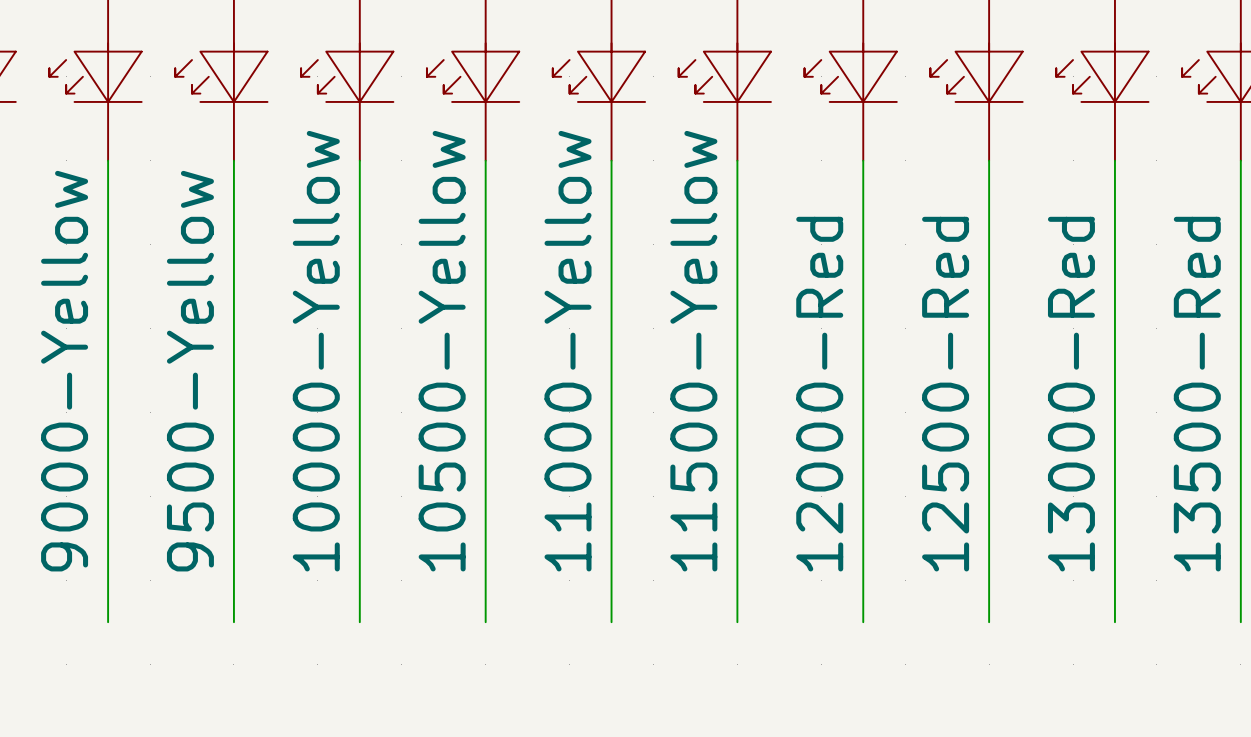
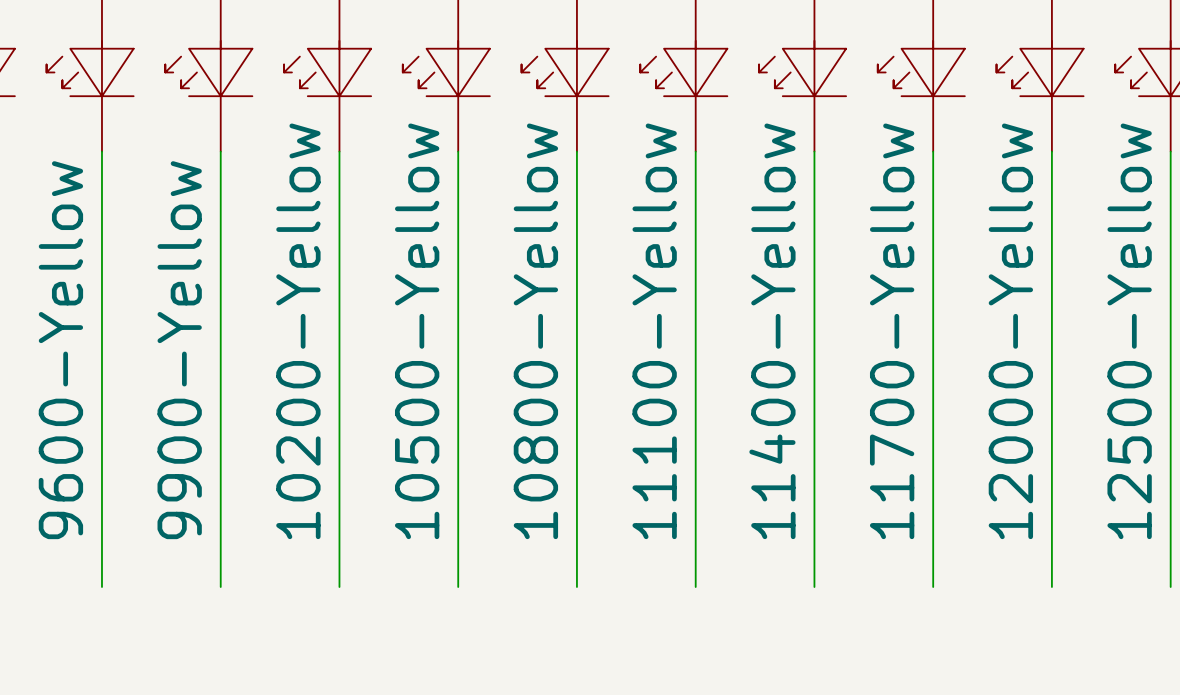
part value: 10000-Yellow (316, 351) -> 10200-Yellow (298, 331)
part value: 11000-Yellow (568, 351) -> 10800-Yellow (535, 331)
part value: 11500-Yellow (693, 351) -> 11100-Yellow (654, 331)
part value: 9000-Yellow (64, 371) -> 9600-Yellow (60, 350)
part value: 9500-Yellow (190, 371) -> 9900-Yellow (179, 350)
part value: 12000-Red (819, 394) -> 11400-Yellow (772, 331)
part value: 12500-Red (945, 394) -> 11700-Yellow (892, 331)
part value: 13000-Red (1071, 394) -> 12000-Yellow (1010, 331)
part value: 13500-Red (1197, 394) -> 12500-Yellow (1129, 331)

